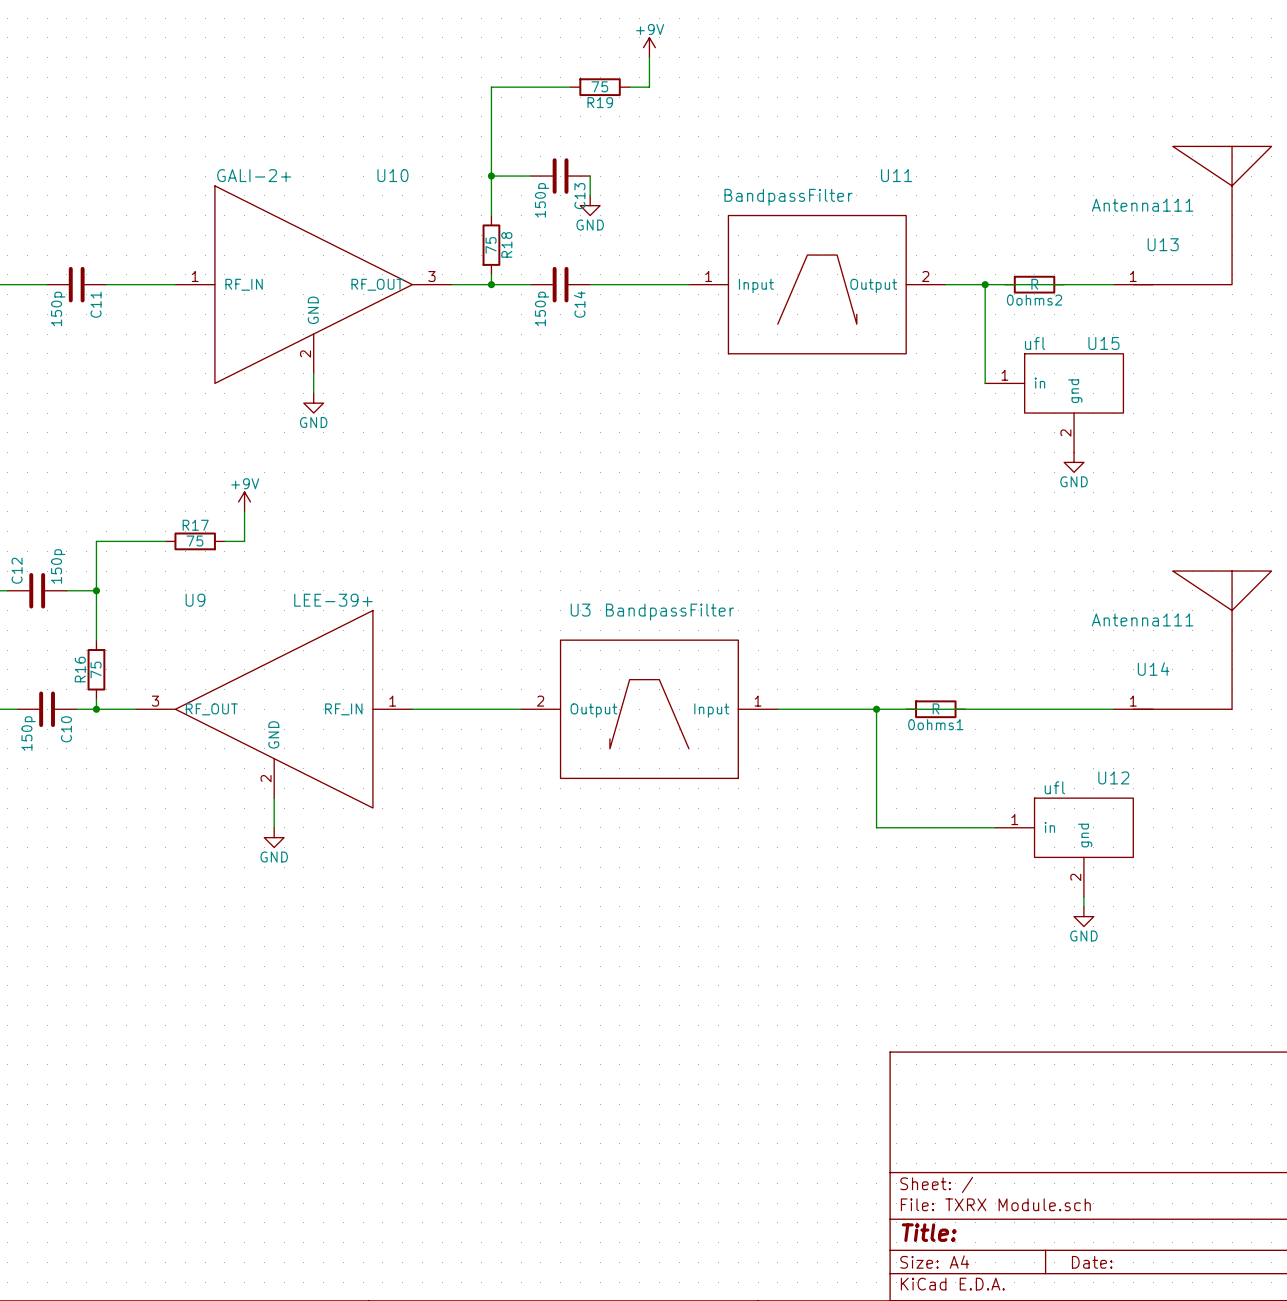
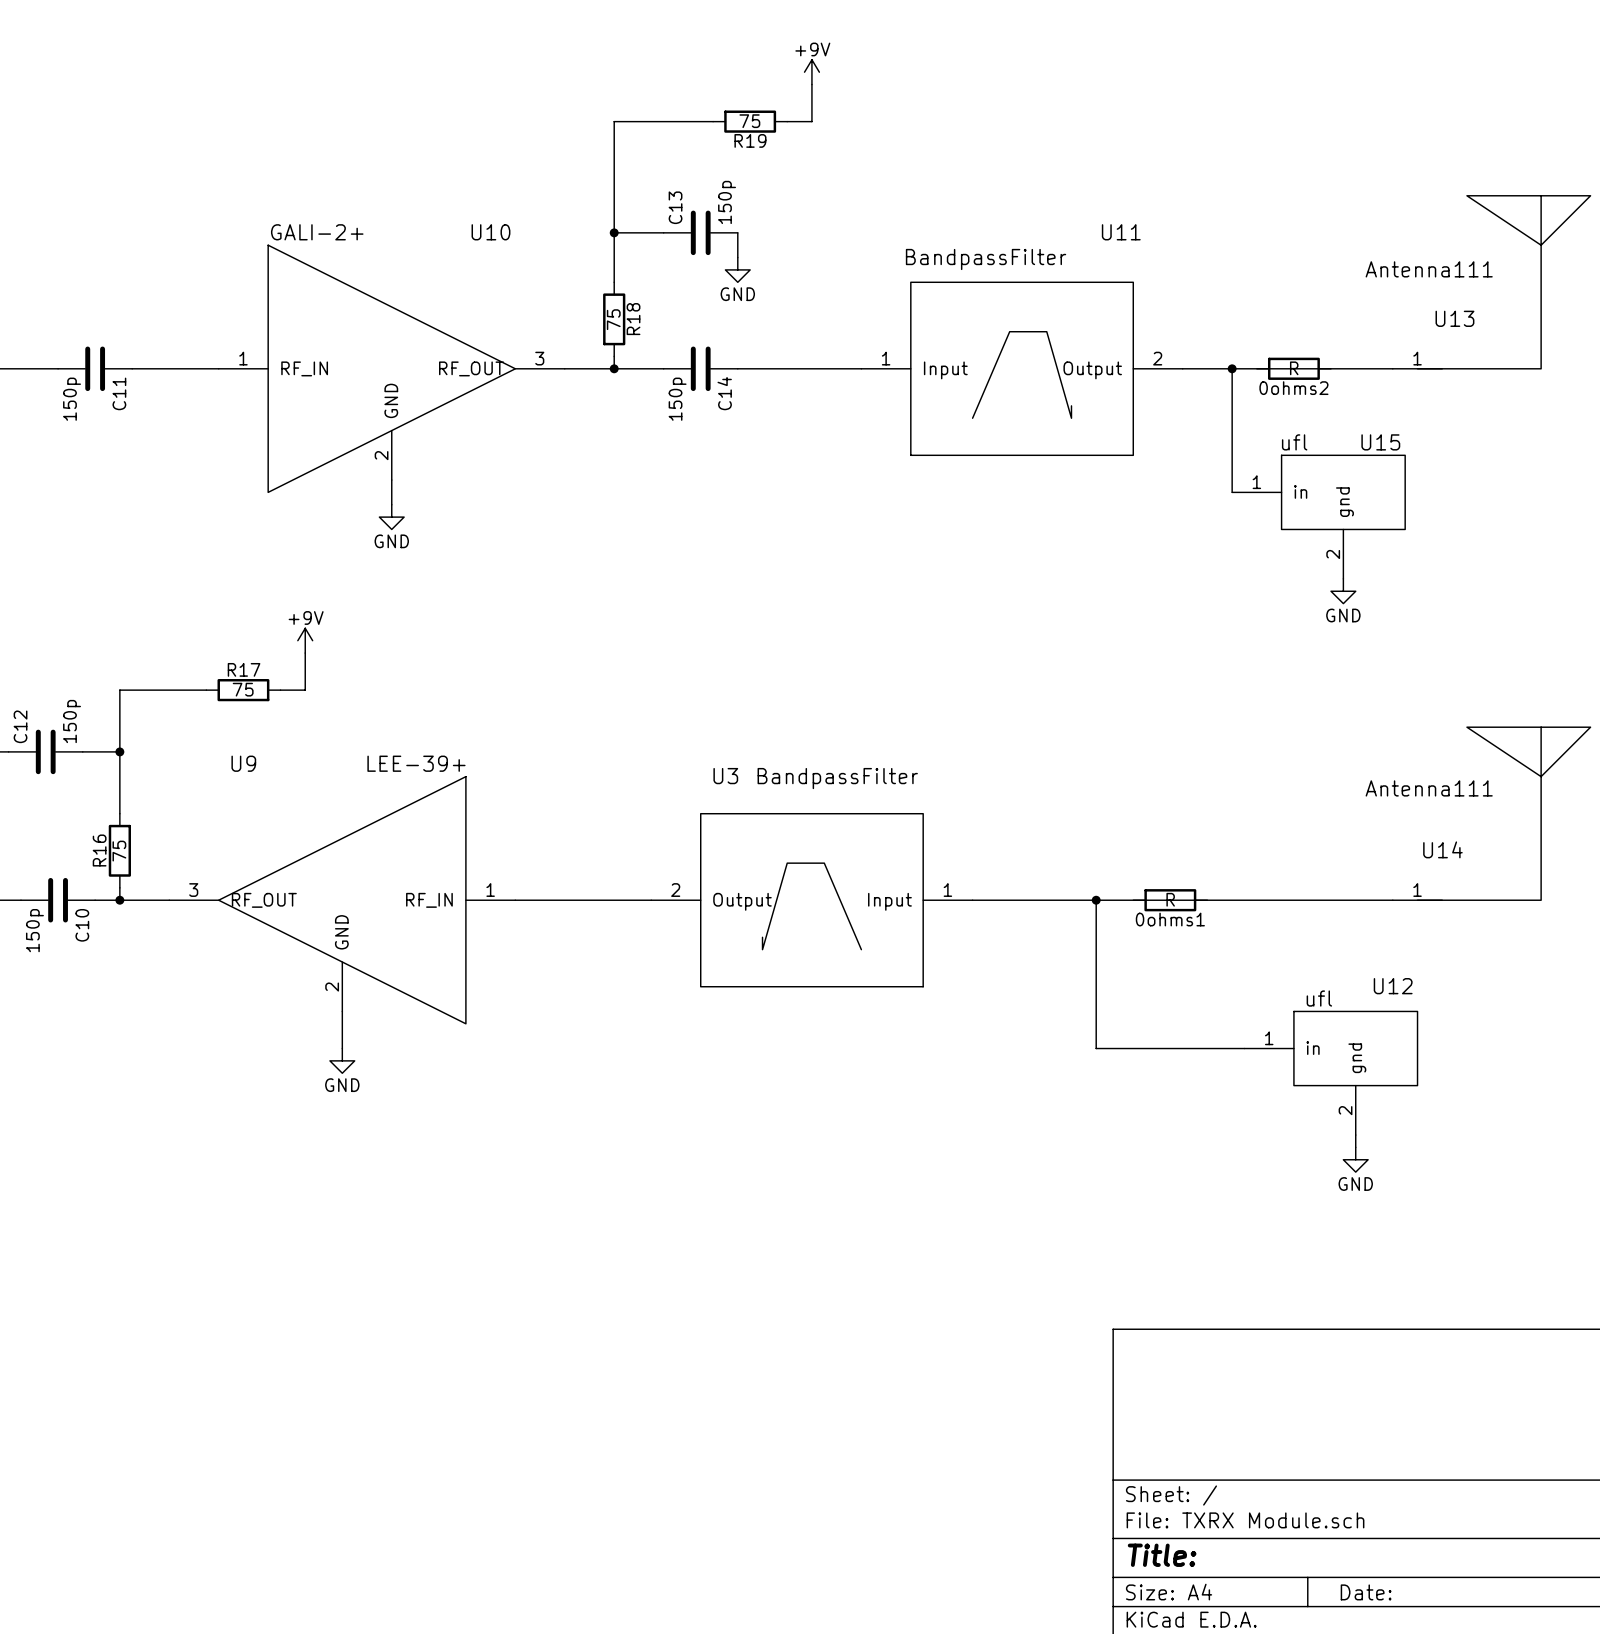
C13 name position: C13 (579, 196) -> C13 (675, 207)
C13 value position: 150p (542, 200) -> 150p (727, 202)

